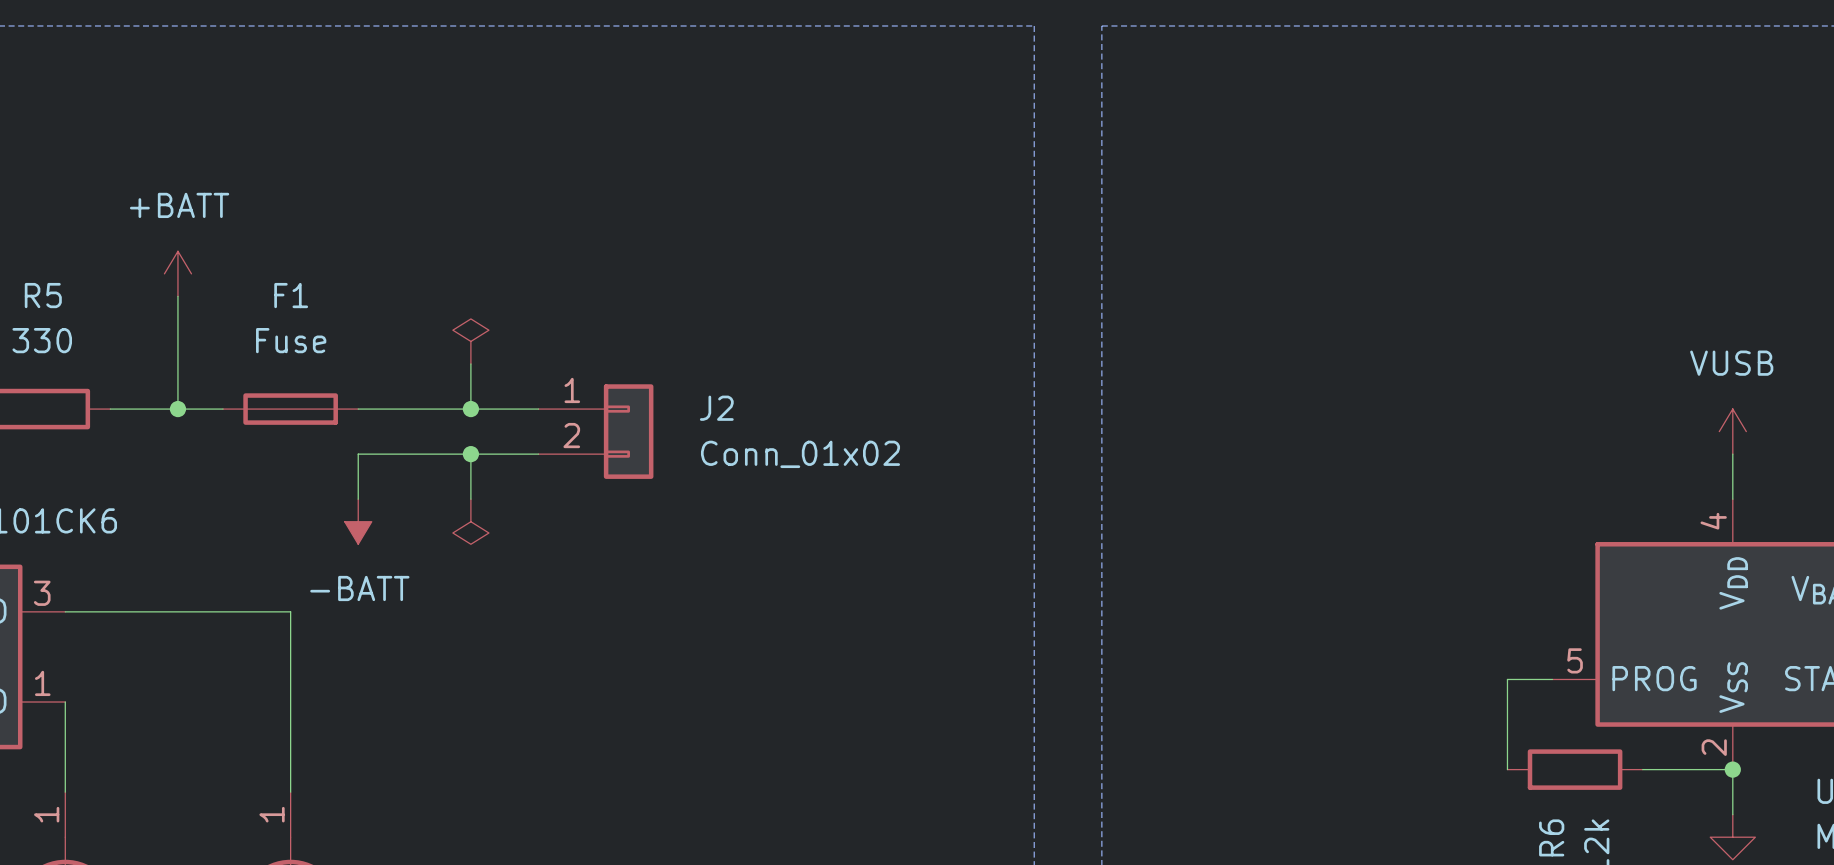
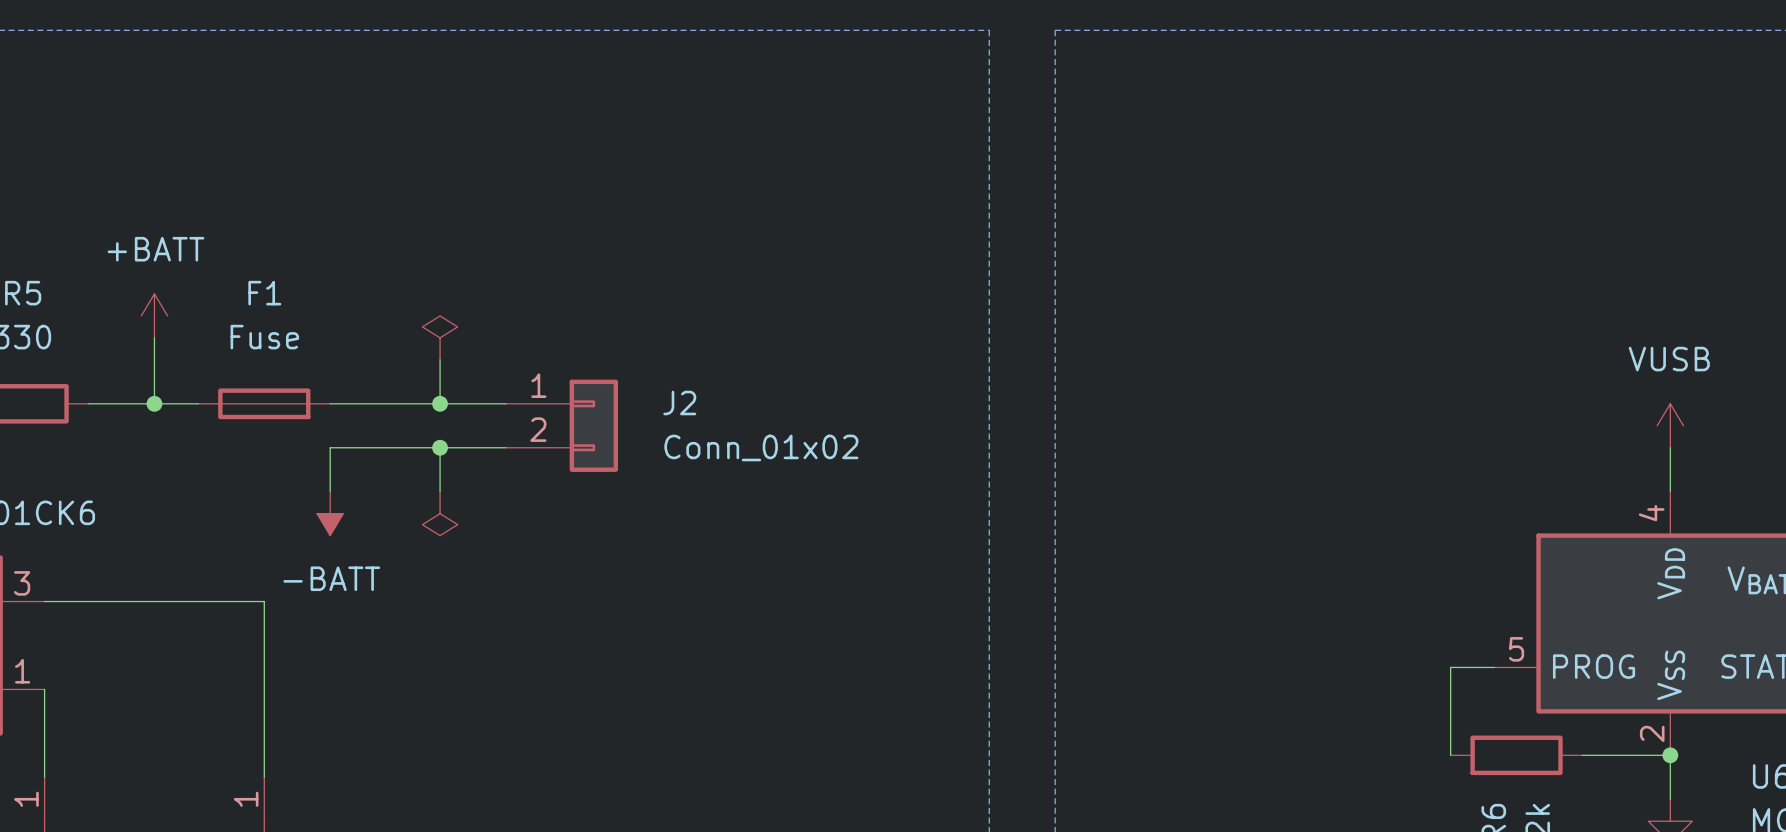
power symbol position: +BATT (177, 273) -> +BATT (154, 315)

